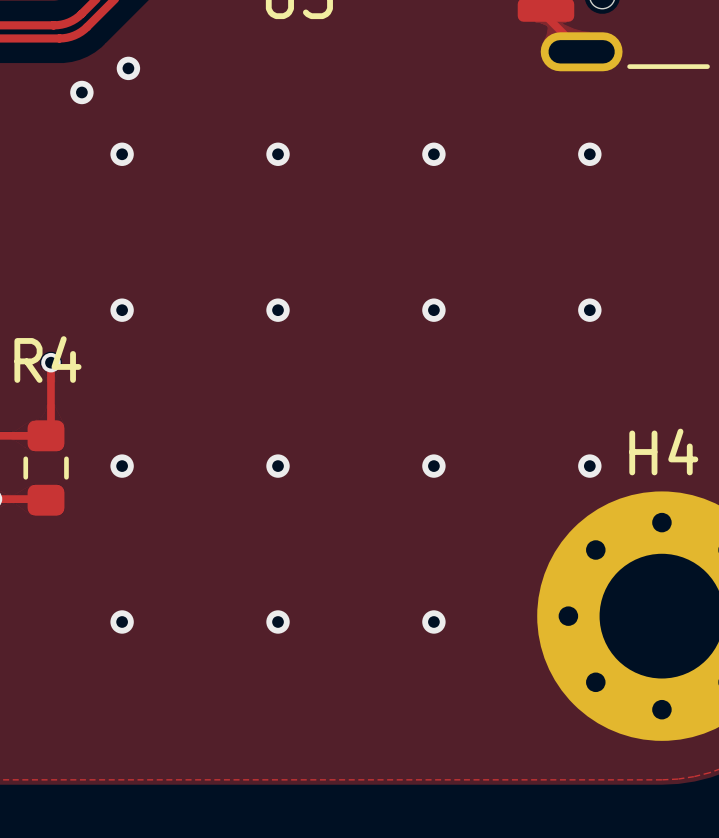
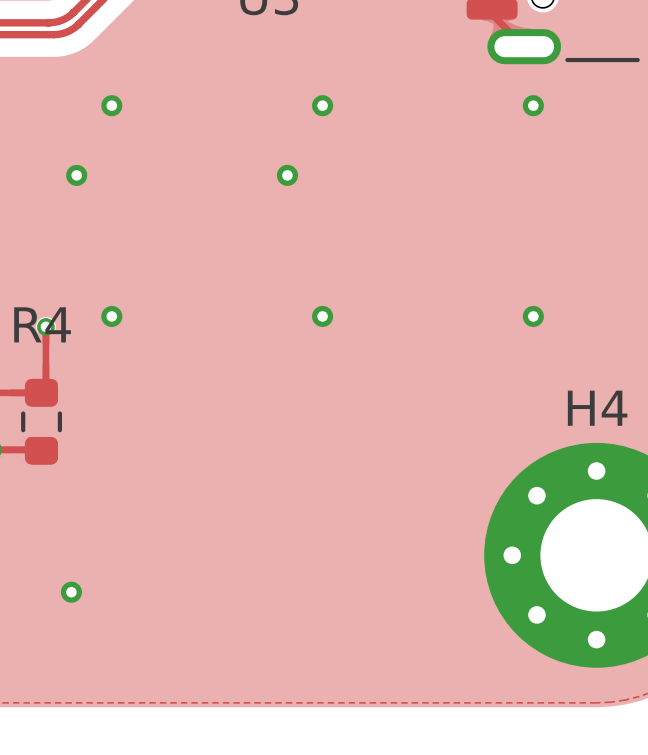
via: (128, 68) -> none
via: (81, 92) -> none
via: none -> (111, 105)
via: none -> (322, 105)
via: (122, 154) -> none
via: (278, 154) -> none
via: (433, 154) -> none
via position: (589, 154) -> (533, 105)
via: none -> (76, 175)
via: none -> (287, 175)
via position: (122, 310) -> (111, 316)
via: (278, 310) -> none
via: (433, 310) -> none
via position: (589, 310) -> (533, 316)
via: none -> (322, 316)
via: (122, 466) -> none
via: (278, 466) -> none
via: (433, 466) -> none
via: (589, 466) -> none
via position: (122, 621) -> (71, 592)
via: (278, 621) -> none
via: (433, 621) -> none

